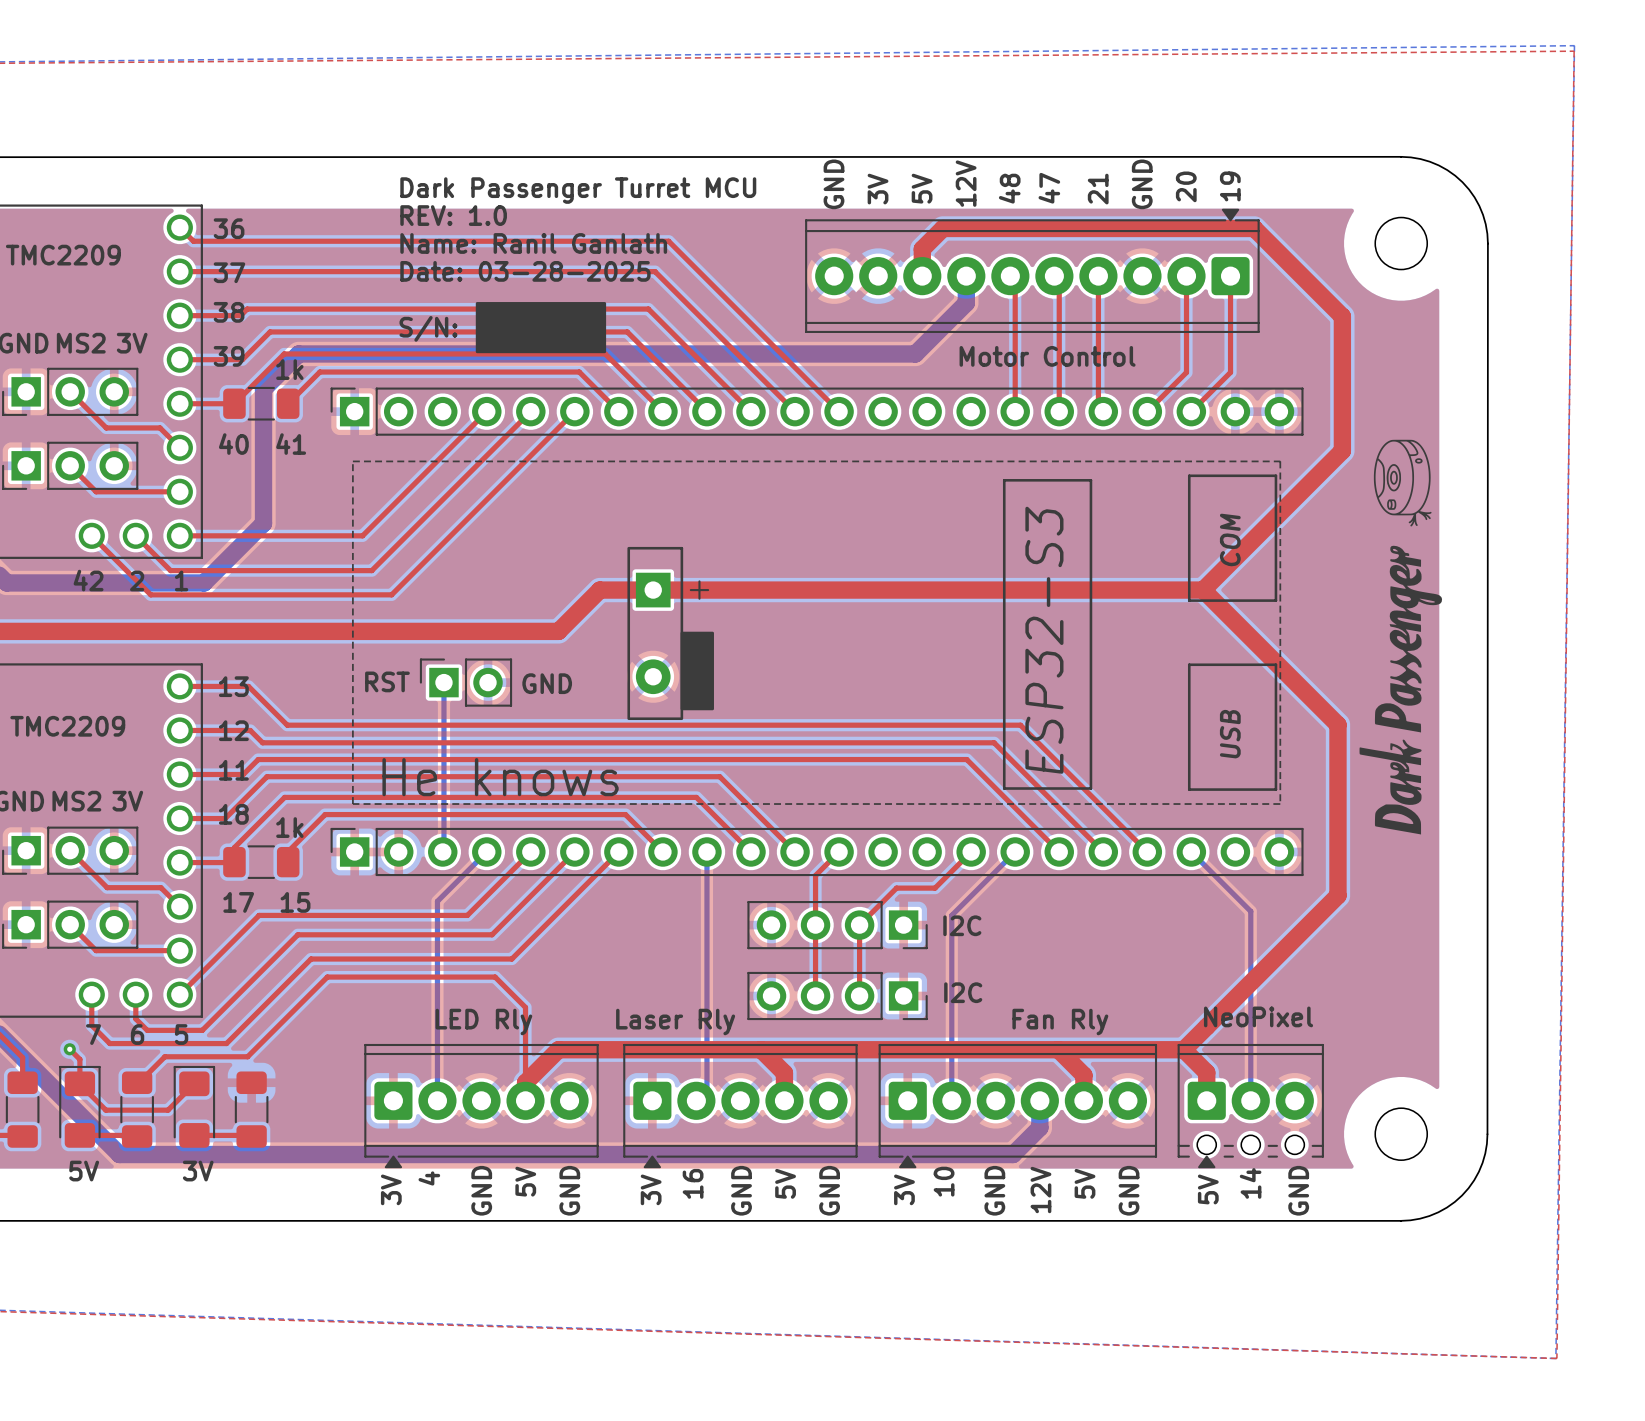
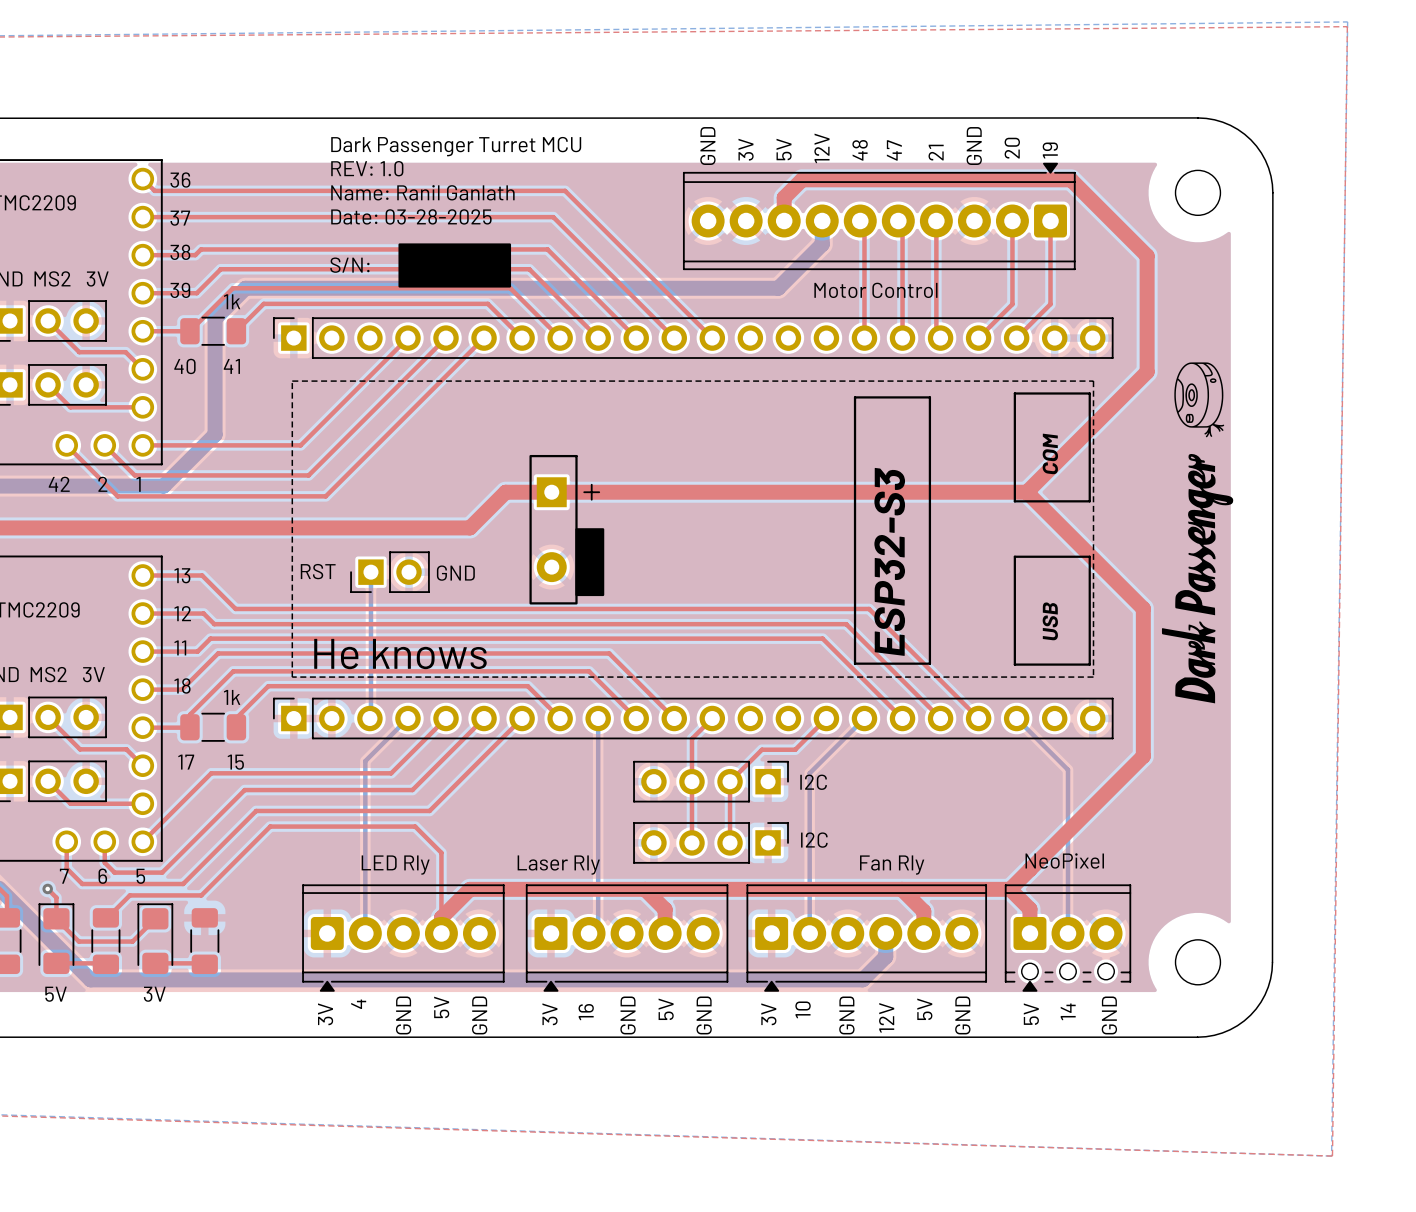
part footprint: [419, 658, 513, 707] -> [350, 551, 430, 593]
part footprint: [747, 901, 928, 950] -> [633, 760, 789, 803]
part footprint: [747, 971, 928, 1021] -> [633, 822, 789, 864]

